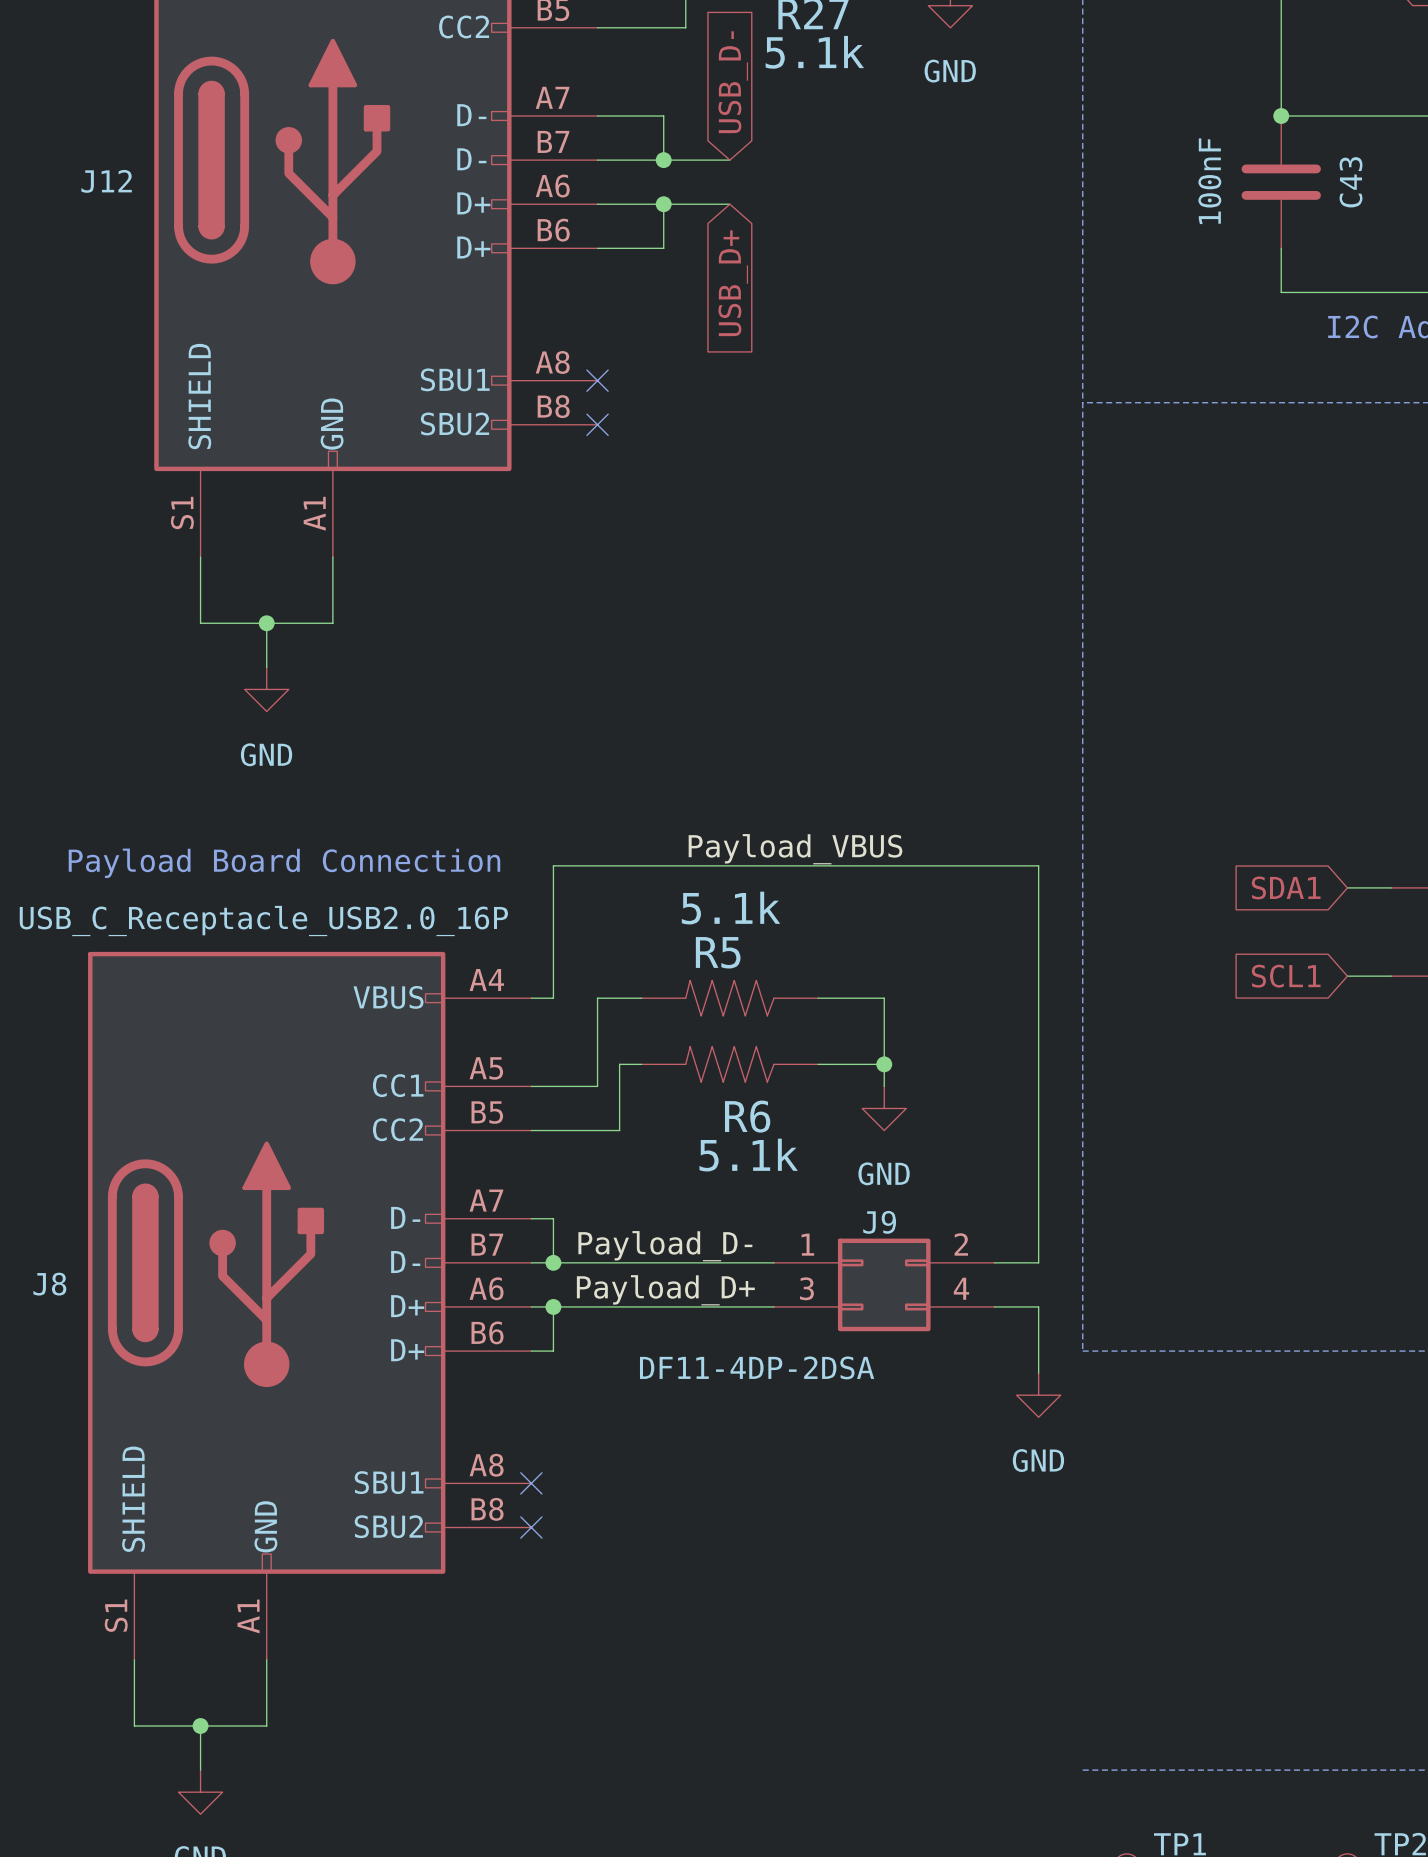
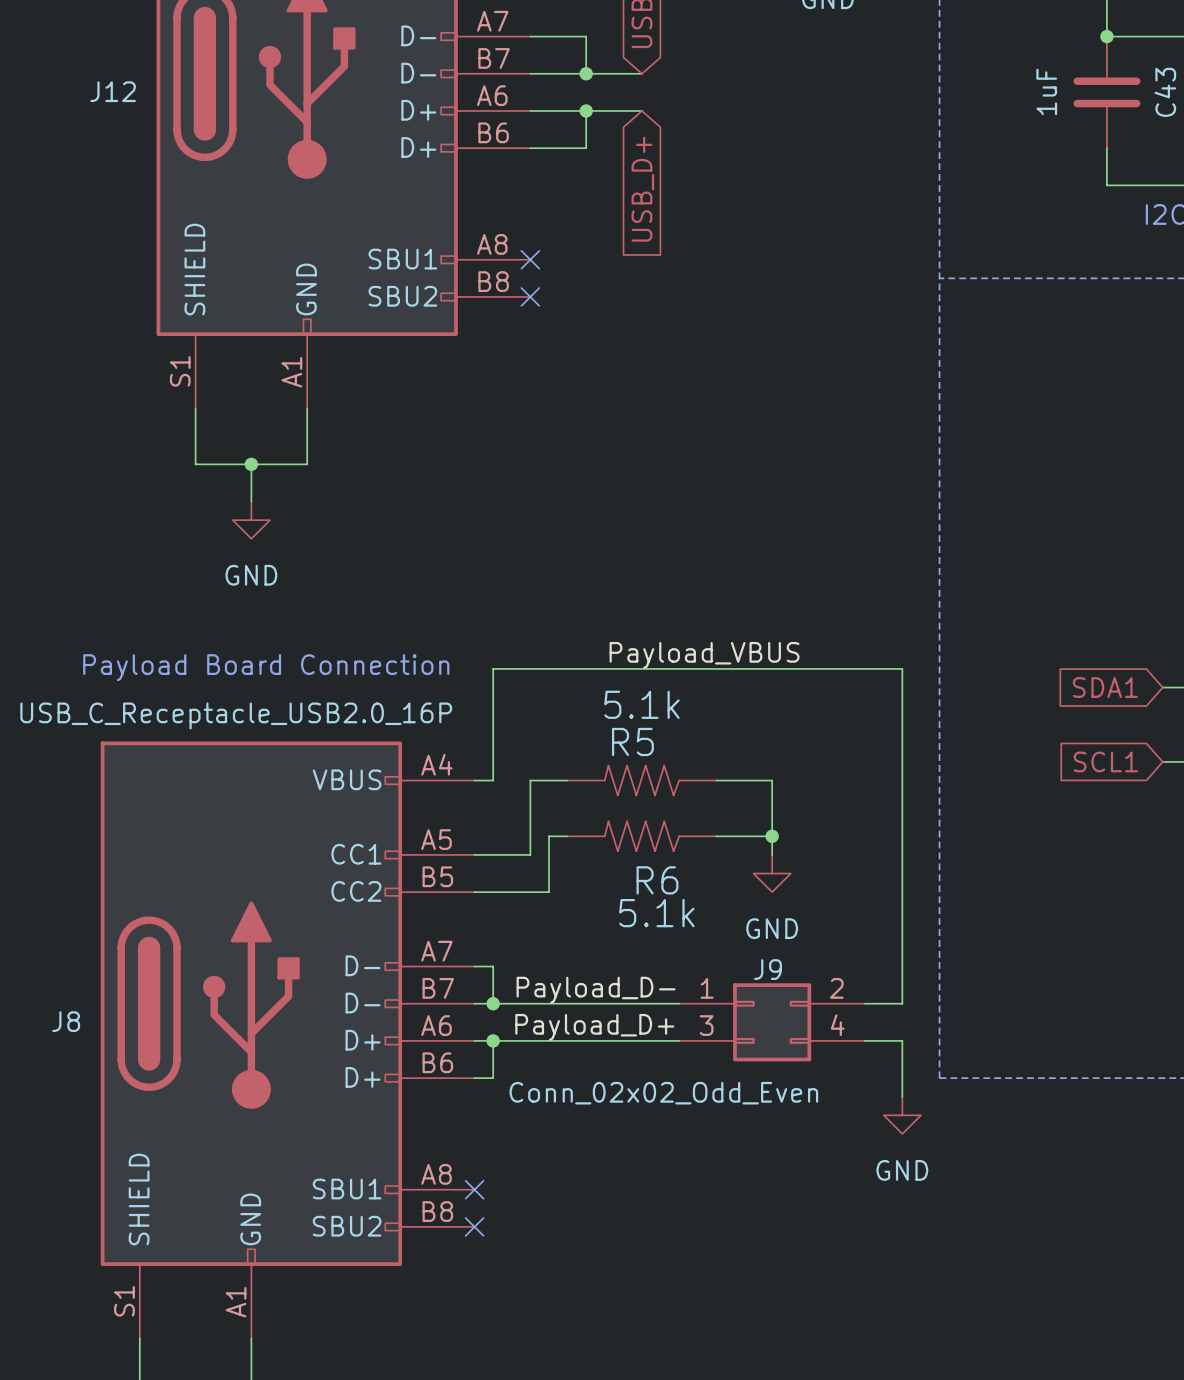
C43 value: 100nF (1209, 181) -> 1uF (1046, 91)
J9 value: DF11-4DP-2DSA (757, 1367) -> Conn_02x02_Odd_Even (663, 1093)

